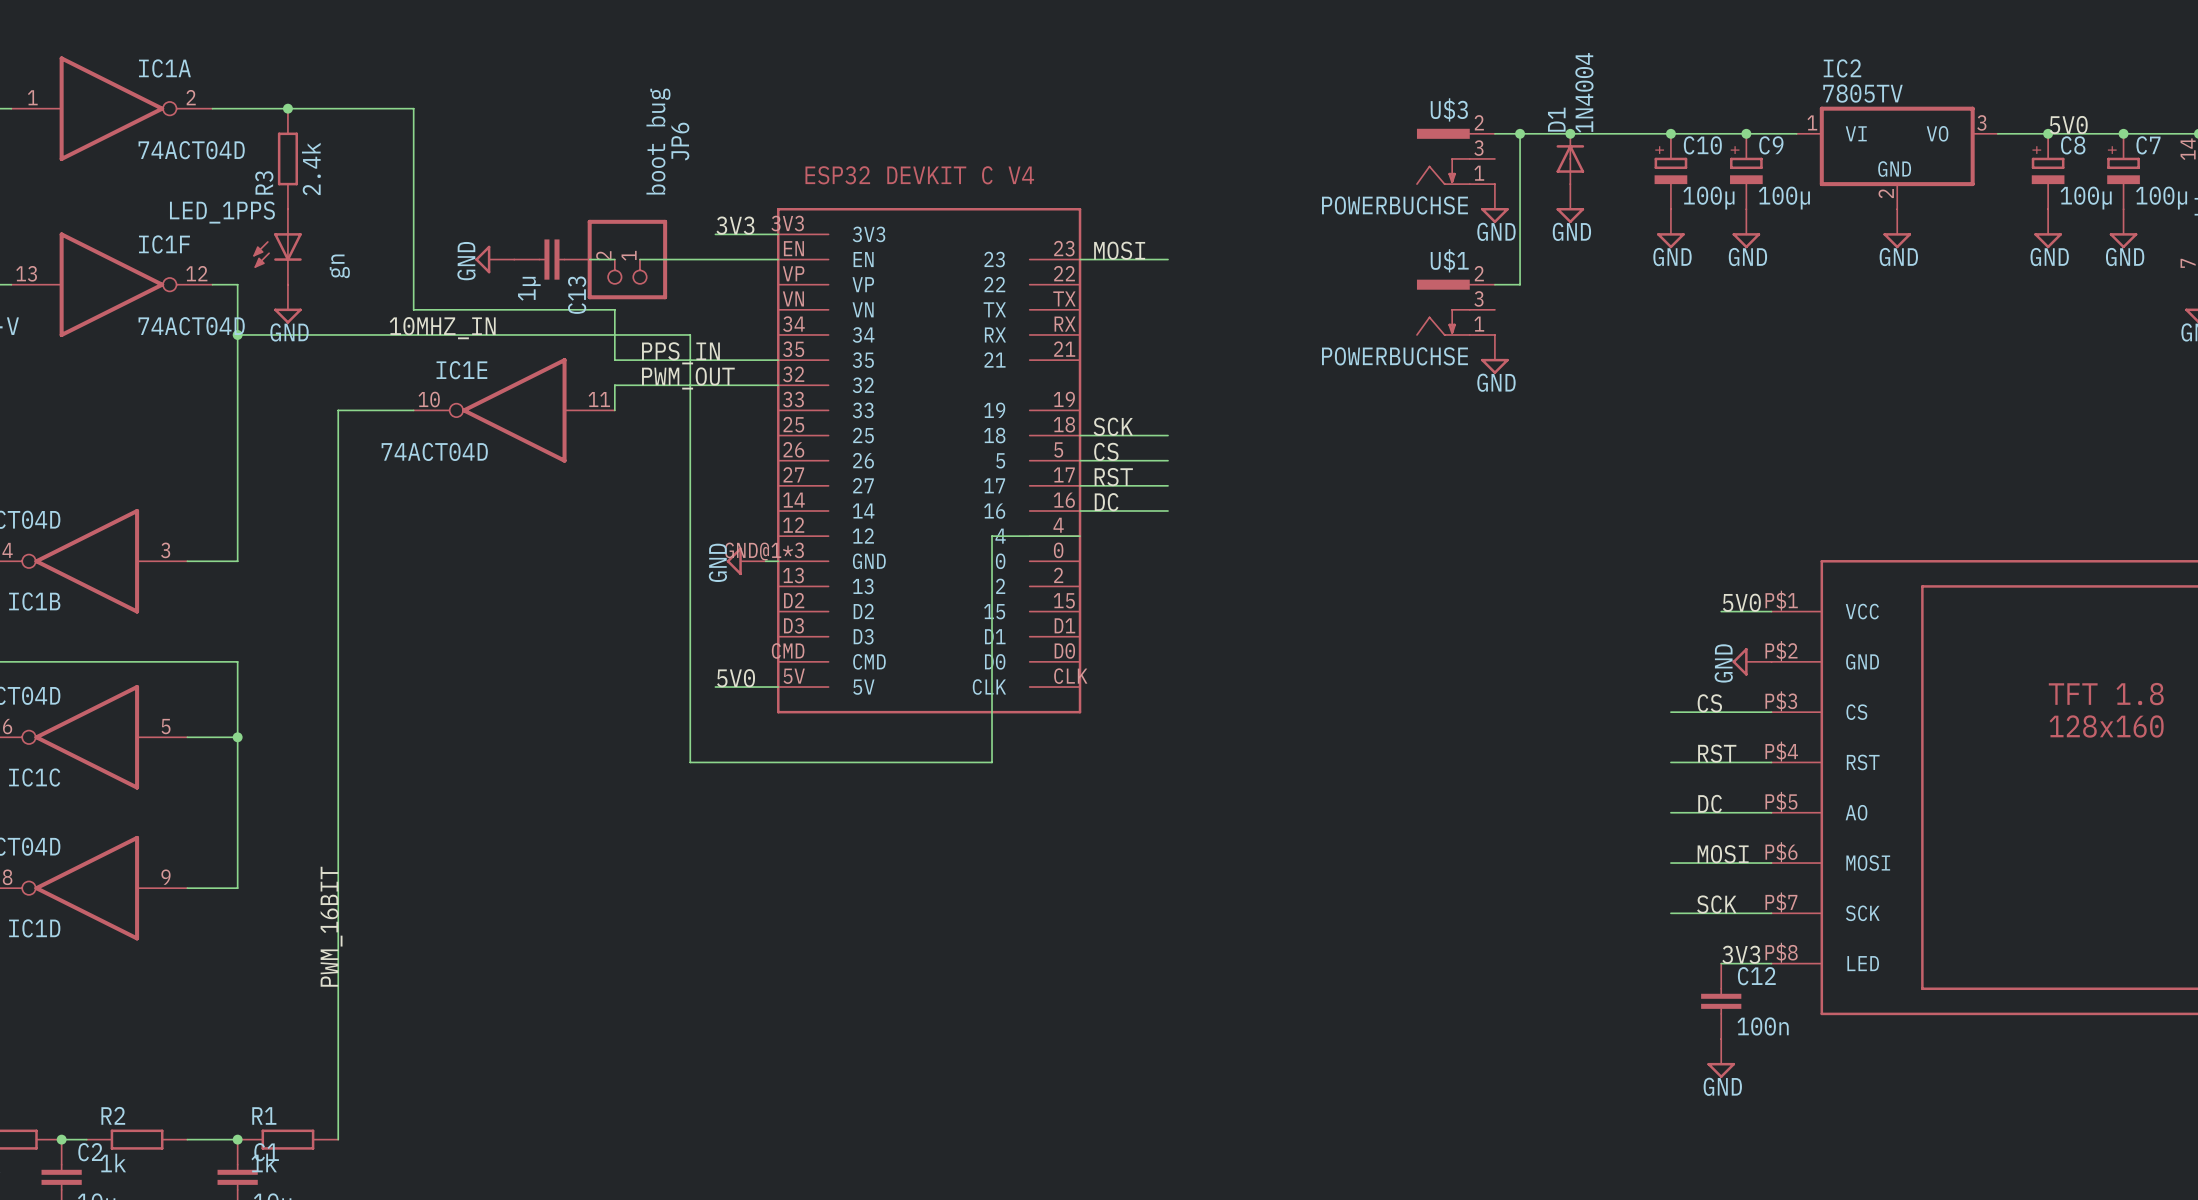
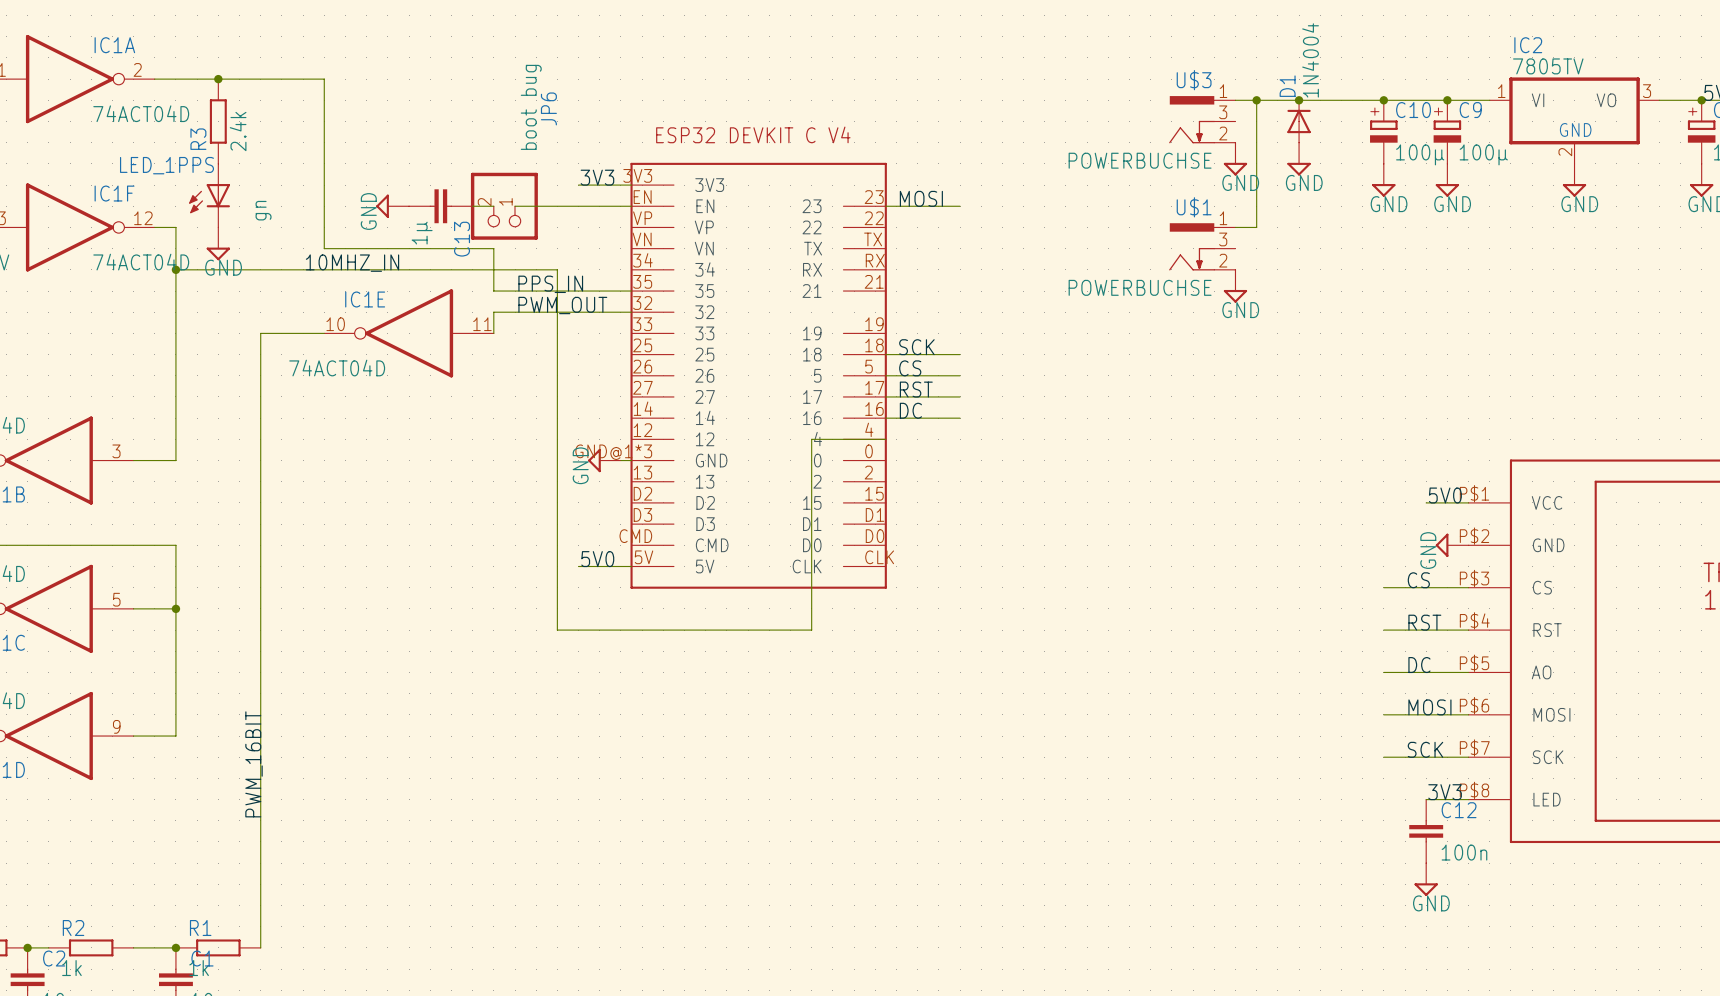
U$3 pin number: 2 (1479, 122) -> 1 (1223, 91)
U$3 pin number: 1 (1479, 173) -> 2 (1223, 133)
U$1 pin number: 2 (1479, 273) -> 1 (1223, 218)
U$1 pin number: 1 (1479, 324) -> 2 (1223, 260)

